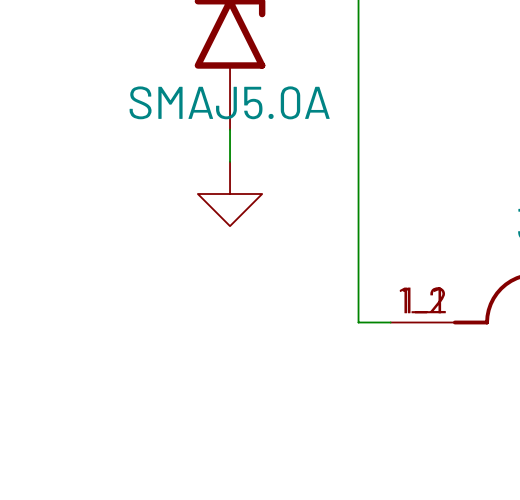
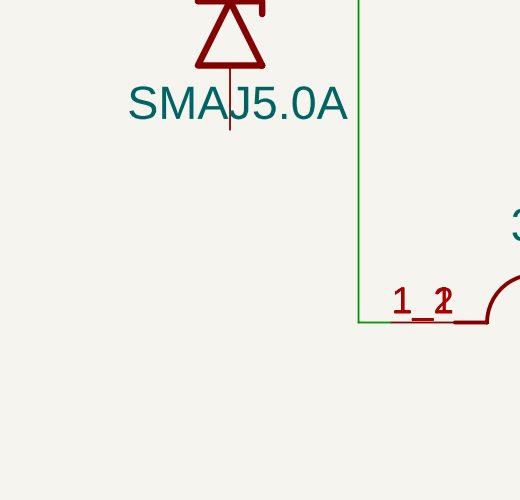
wire: (230, 129) (230, 161) -> none
power symbol: (230, 194) -> none

